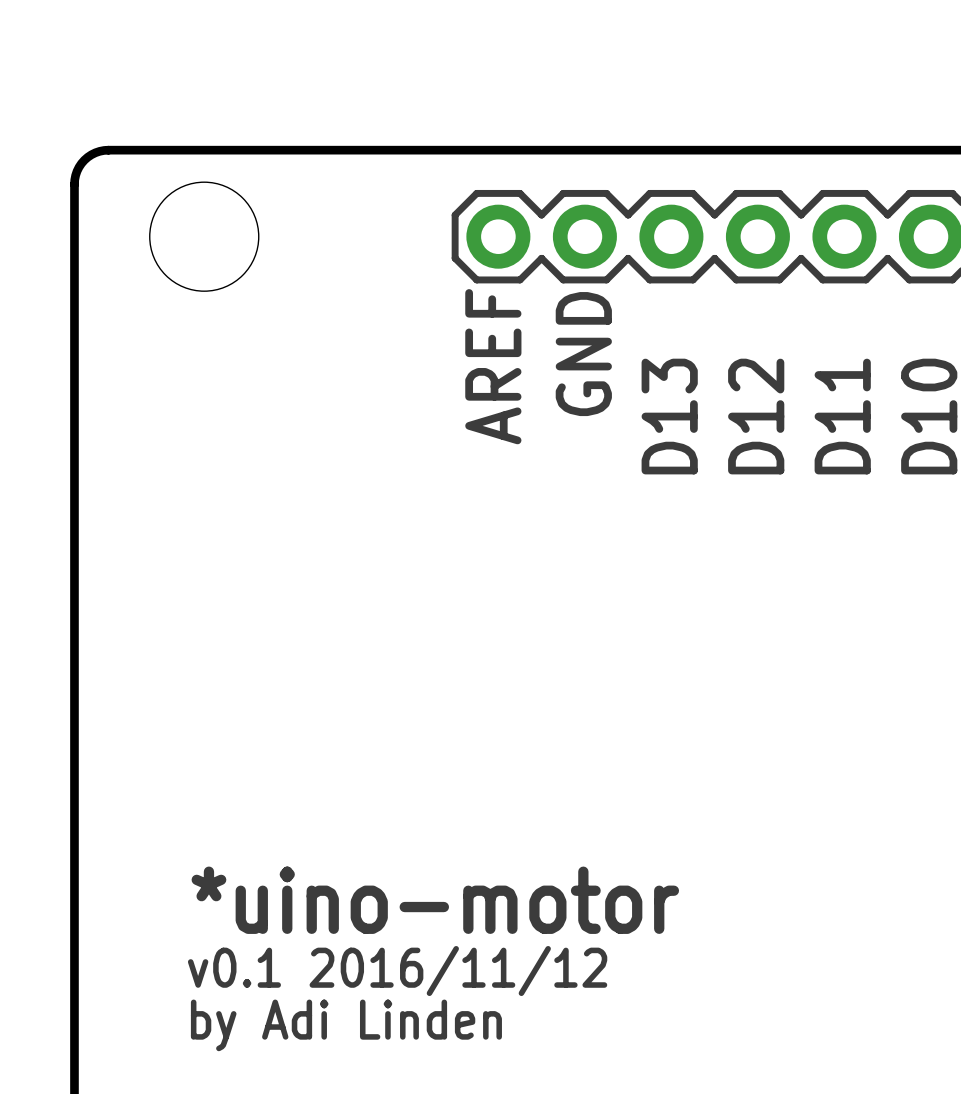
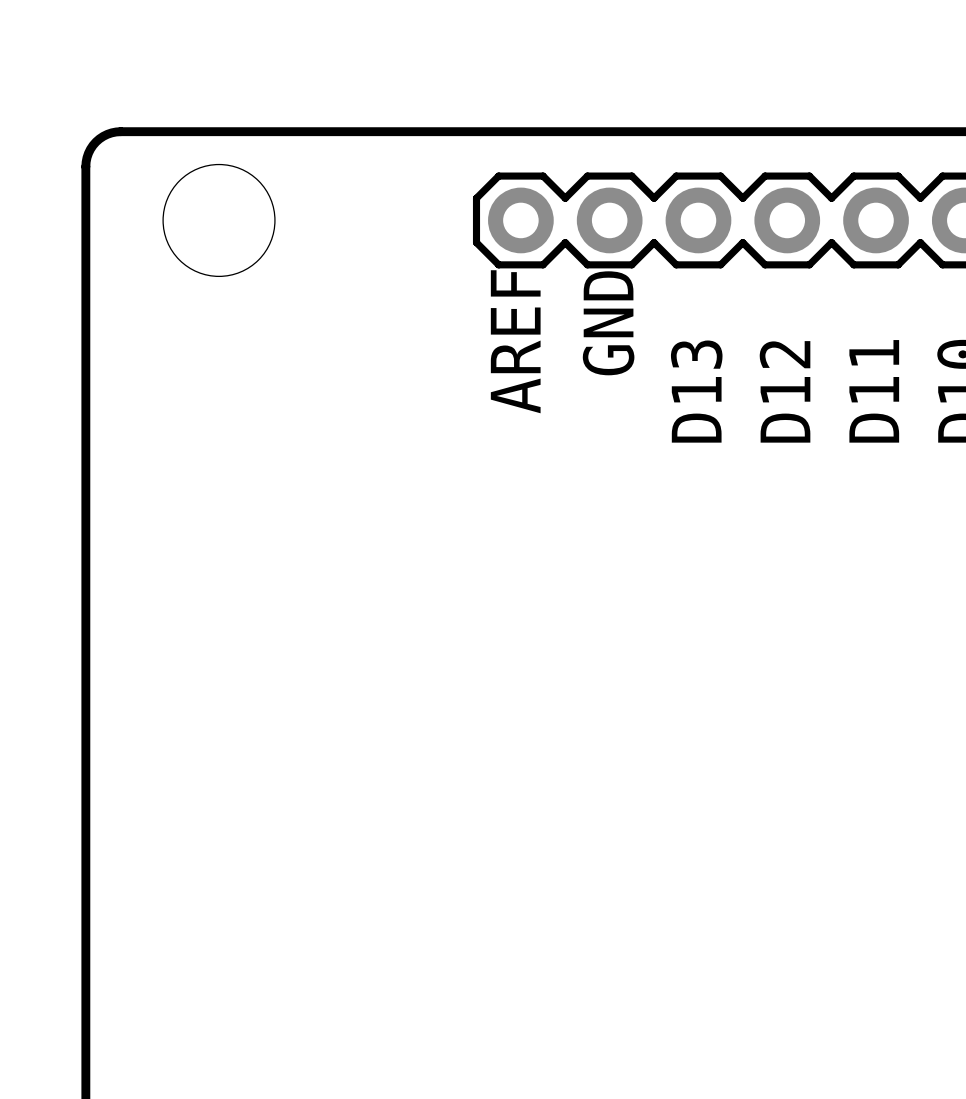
text: *uino-motor (435, 900) -> none
text: v0.1 2016/11/12 (397, 971) -> none
text: by Adi Linden (346, 1025) -> none

